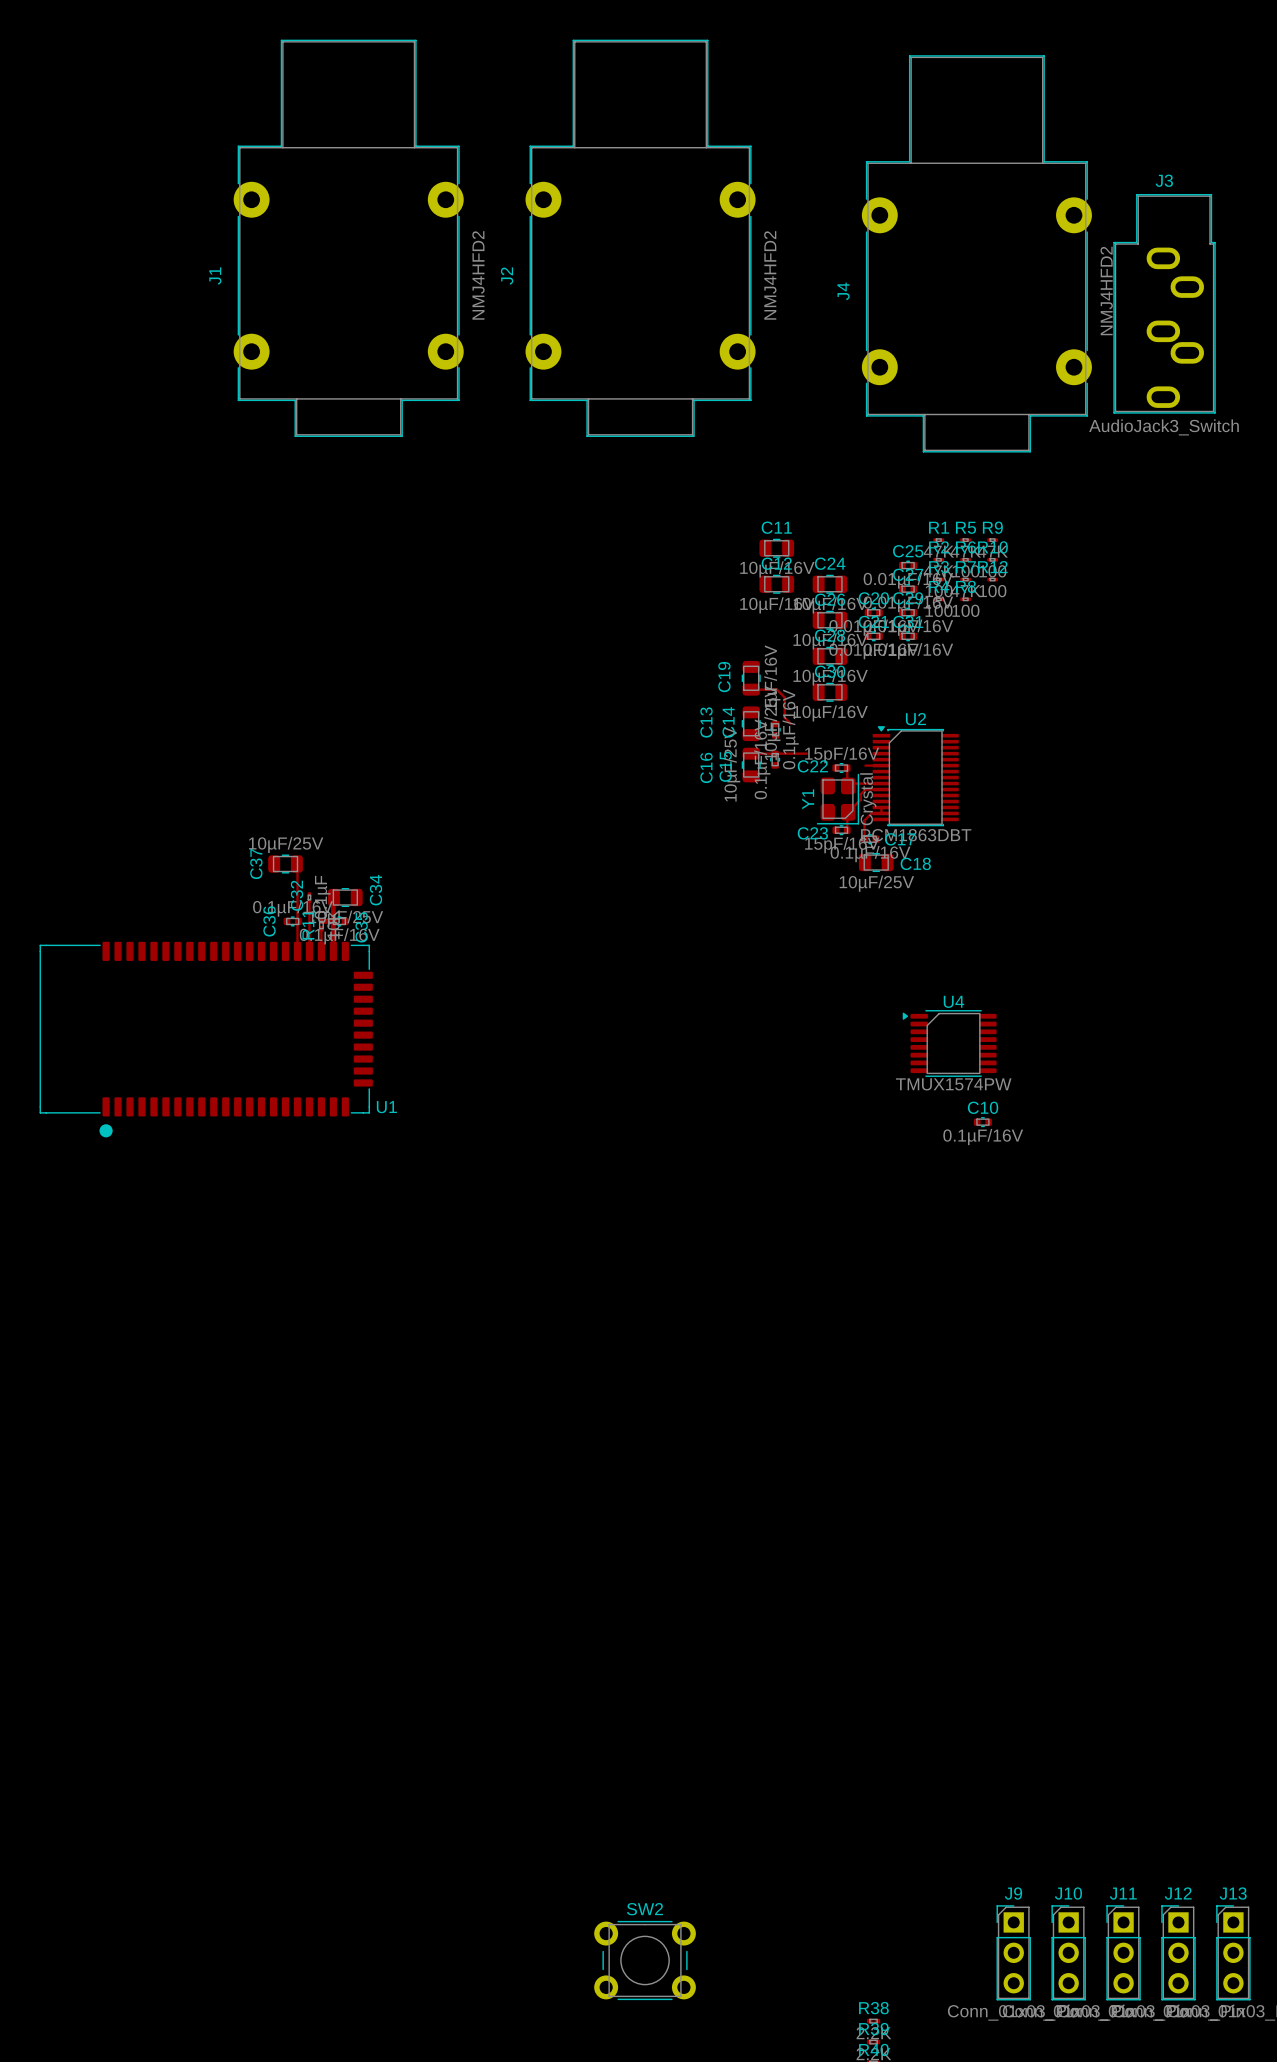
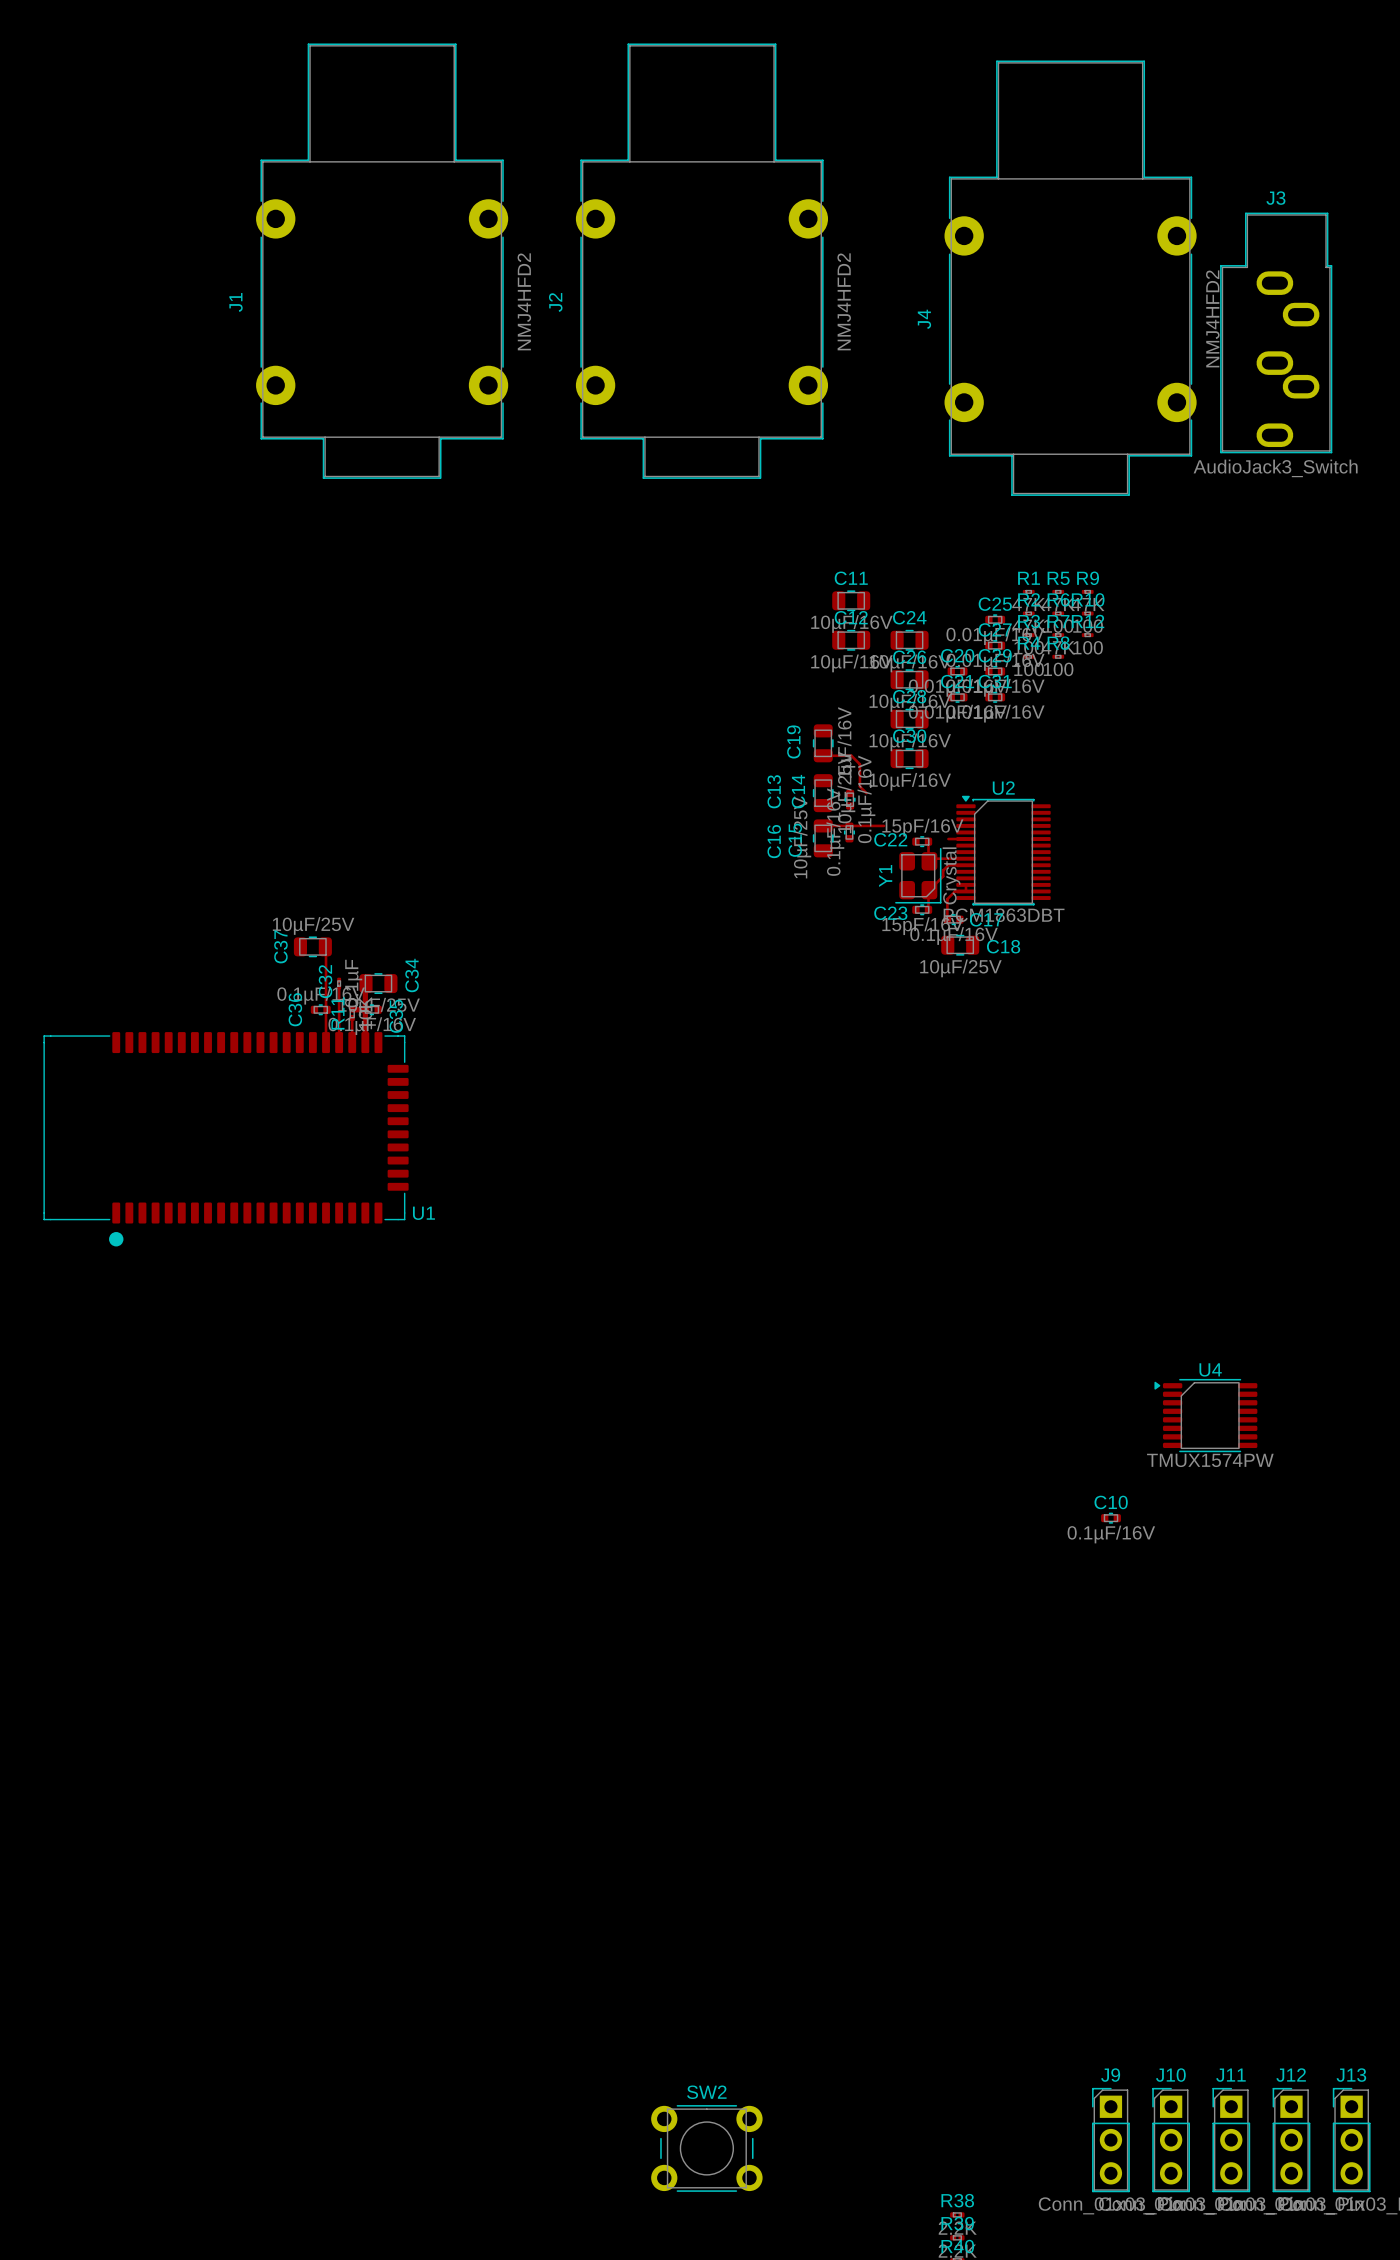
U4 position: (949, 1043) -> (1205, 1415)
C10 position: (982, 1122) -> (1111, 1518)

